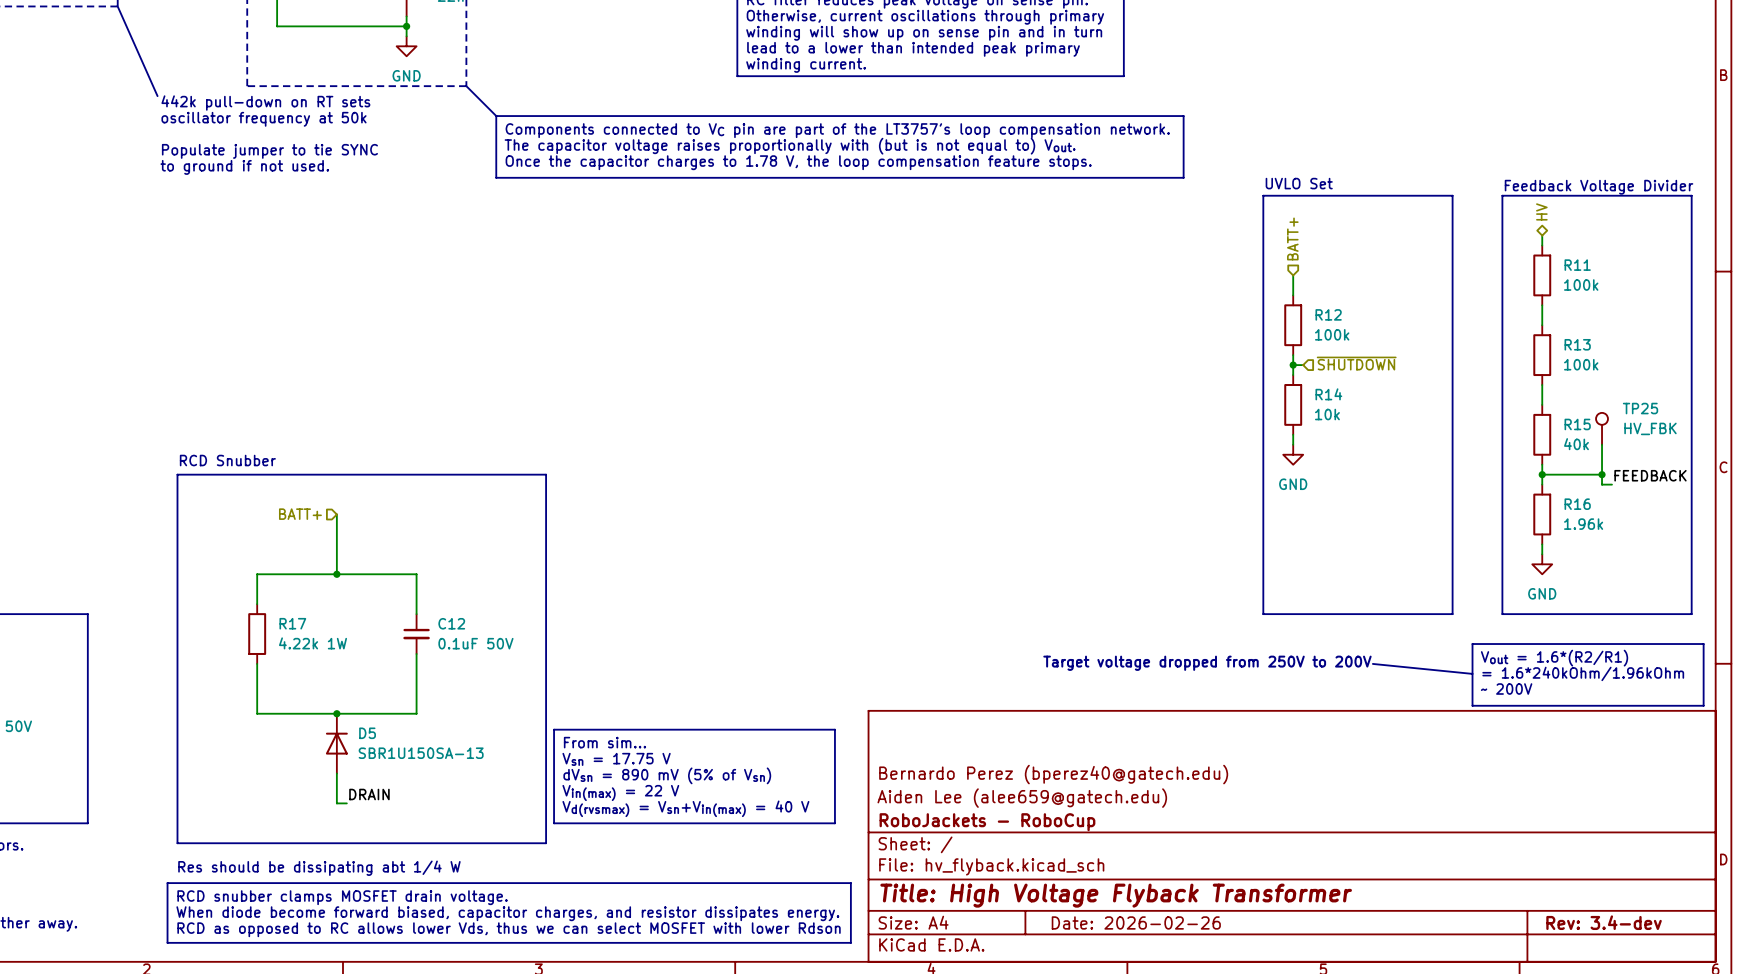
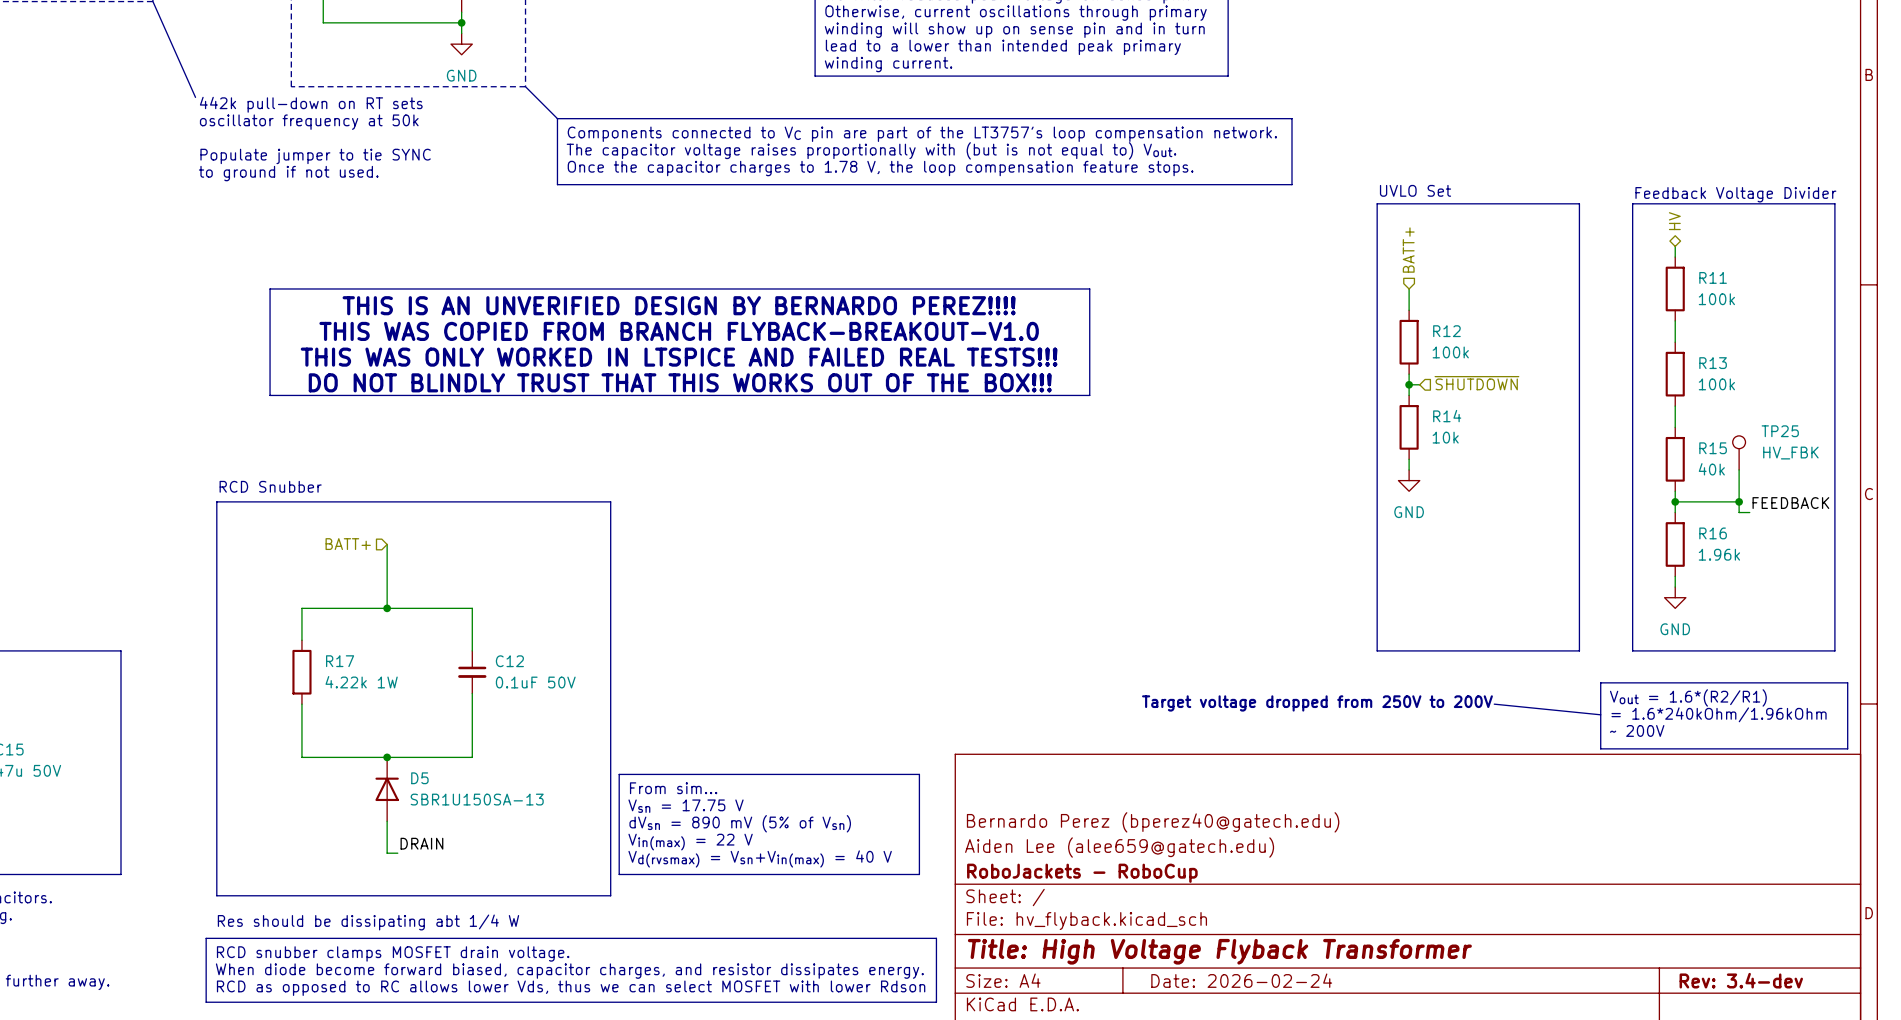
line: none -> (270, 288) (1089, 288) (1089, 395) (270, 395) (270, 288)
text: none -> THIS IS AN UNVERIFIED DESIGN BY BERNARDO PEREZ!!!! (679, 305)
text: none -> THIS WAS COPIED FROM BRANCH FLYBACK-BREAKOUT-V1.0 (679, 331)
text: none -> THIS WAS ONLY WORKED IN LTSPICE AND FAILED REAL TESTS!!! (679, 357)
text: none -> DO NOT BLINDLY TRUST THAT THIS WORKS OUT OF THE BOX!!! (680, 382)
title block: Date: 2026-02-26 (1136, 922) -> Date: 2026-02-24 (1241, 980)

